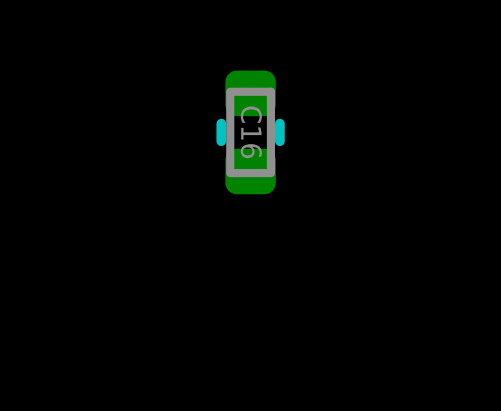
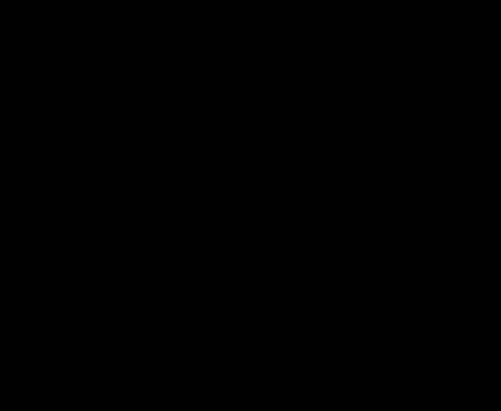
C16: (250, 132) -> none

